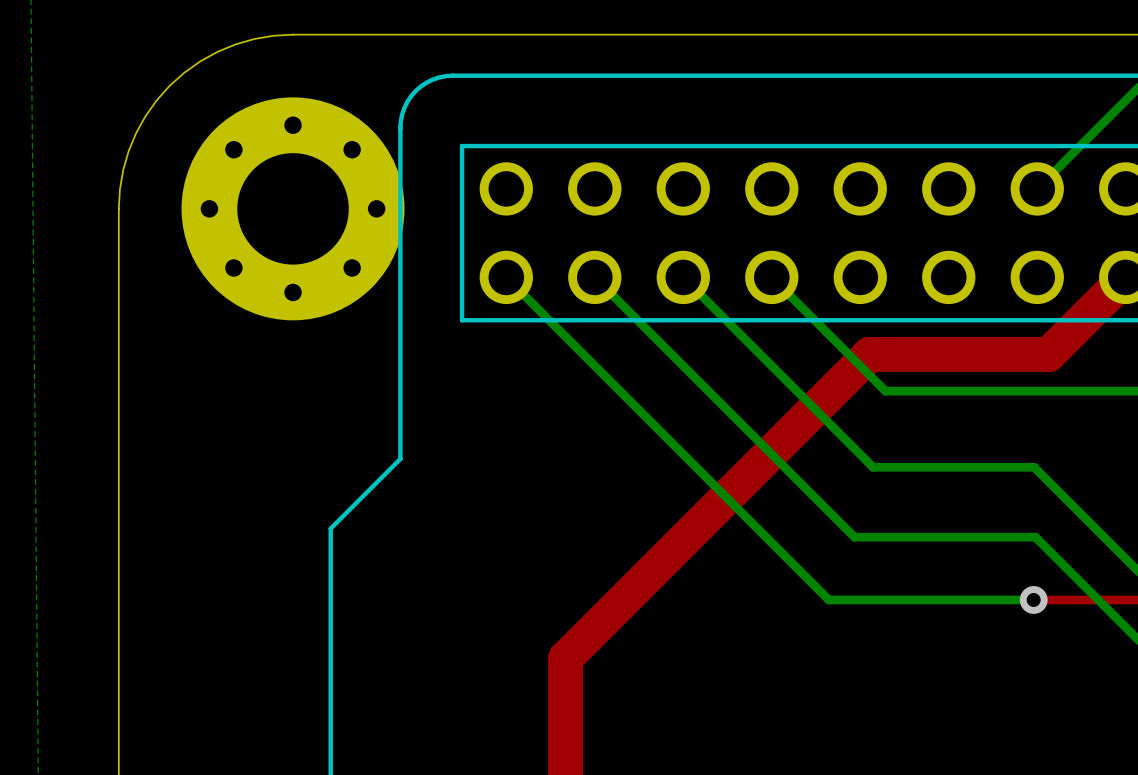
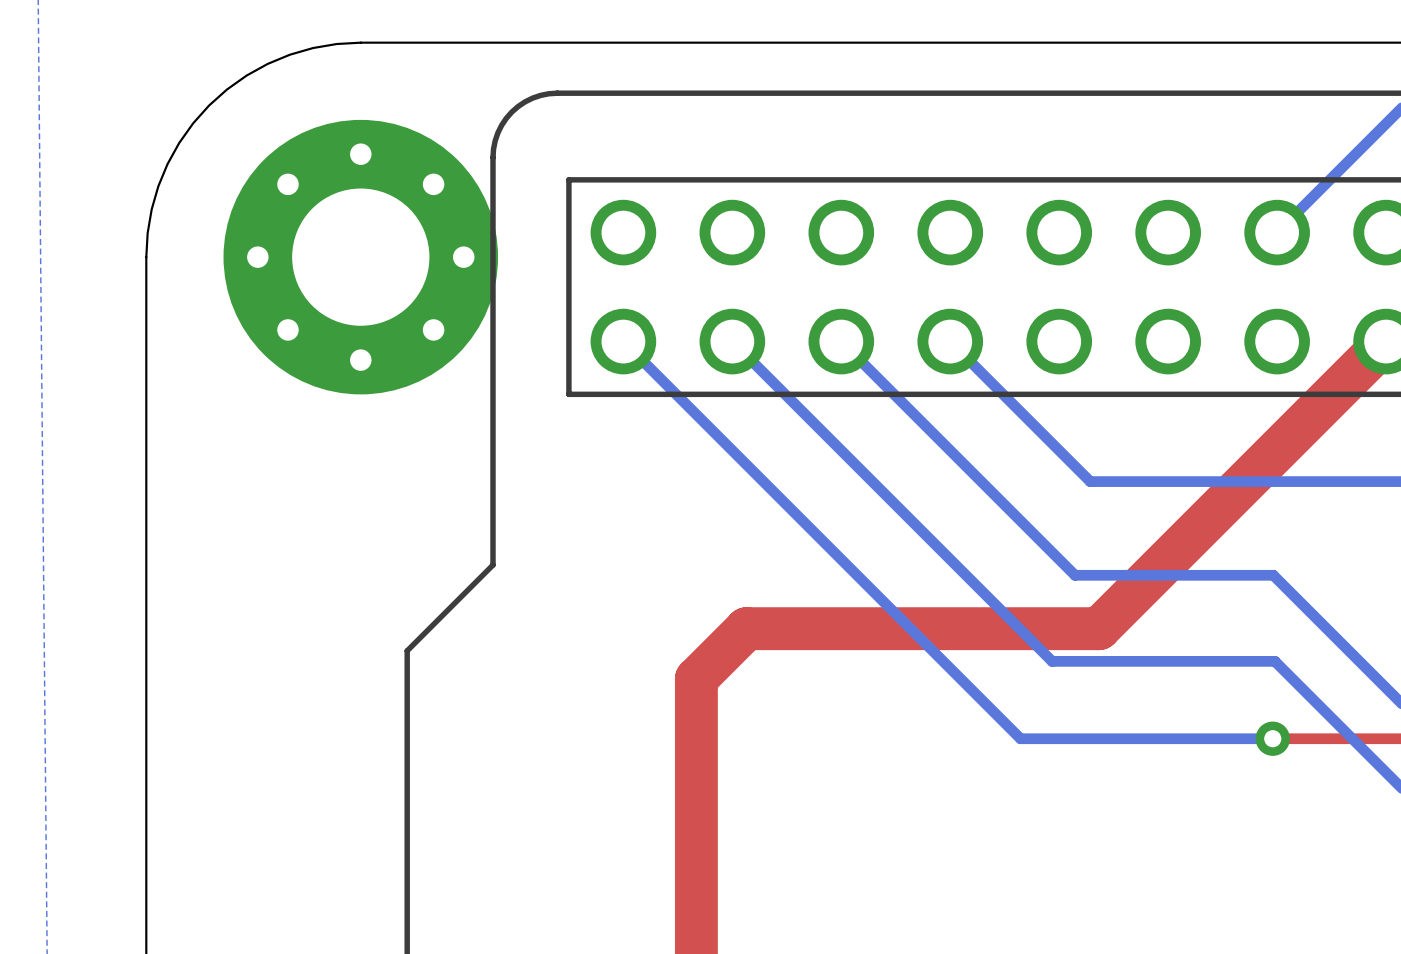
top track: (1048, 354) (869, 354) (565, 658) -> (1291, 436) (1098, 628) (746, 628) (696, 678) (696, 810)

